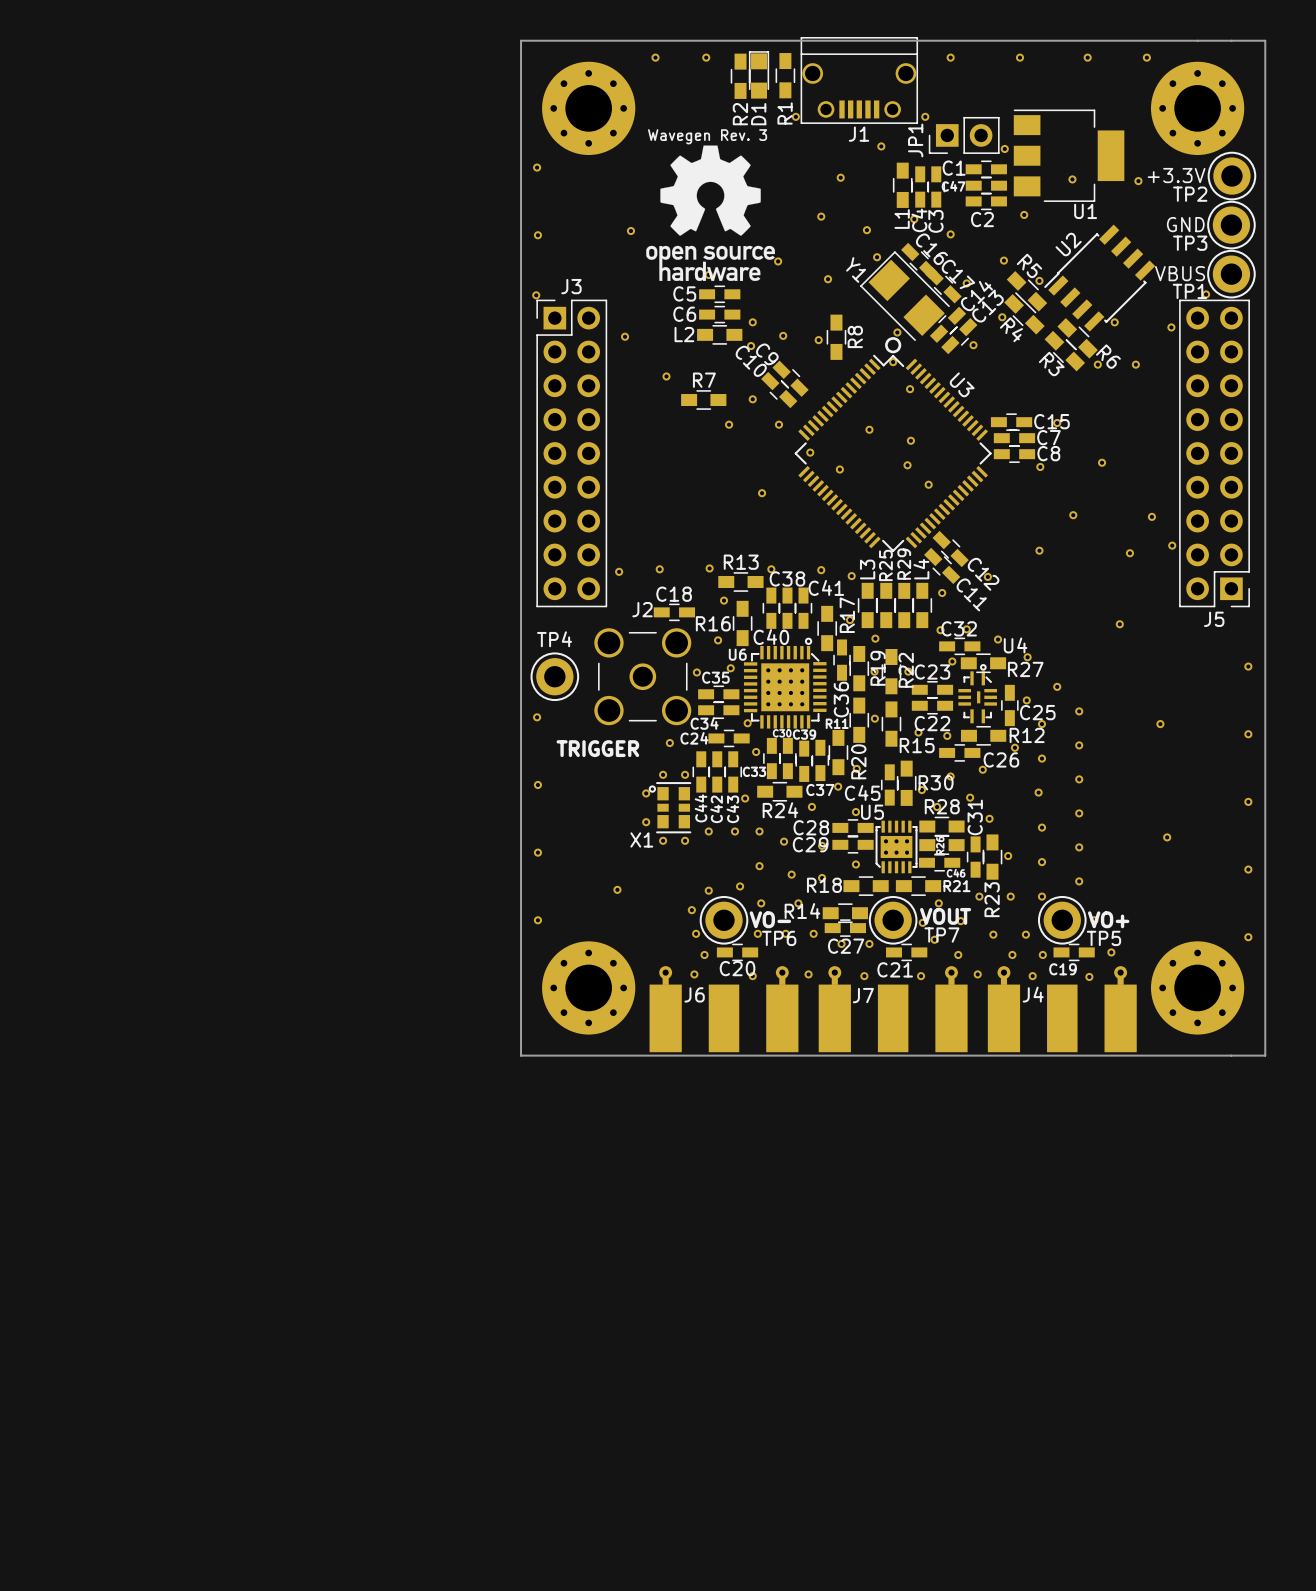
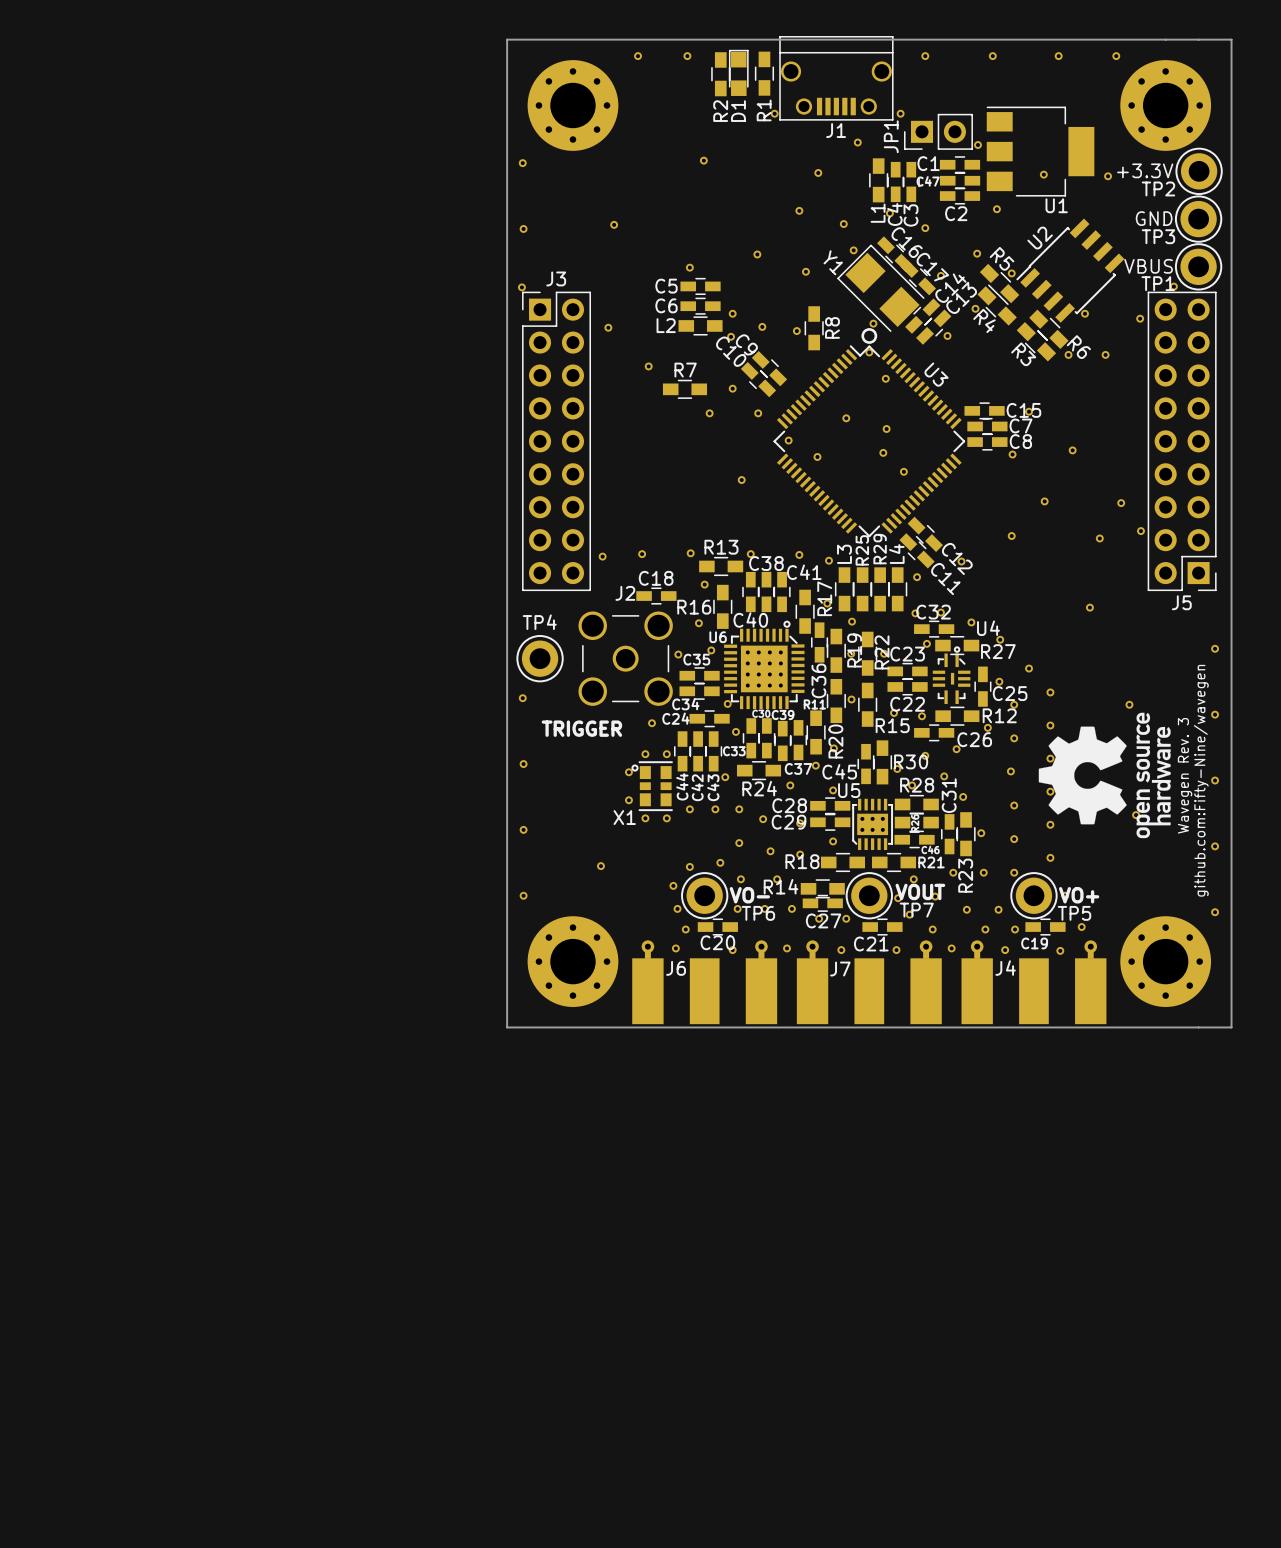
text: Wavegen Rev. 3 (707, 136) -> none
drawing: [646, 145, 775, 281] -> none
drawing: none -> [1038, 712, 1171, 839]
text: none -> Wavegen Rev. 3 (1185, 775)
text: none -> github.com:Fifty-Nine/wavegen (1201, 780)

